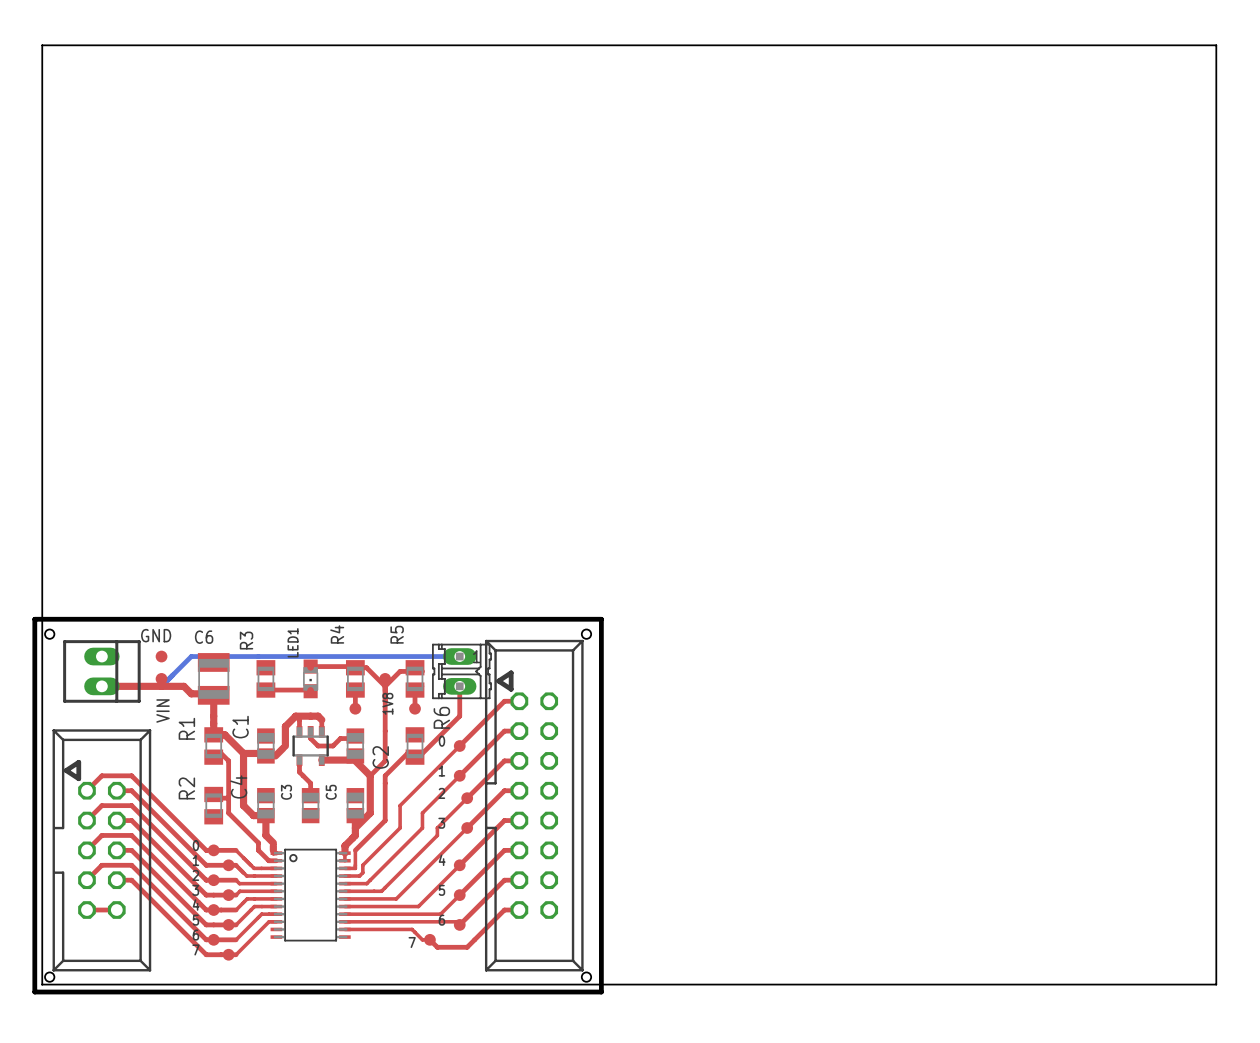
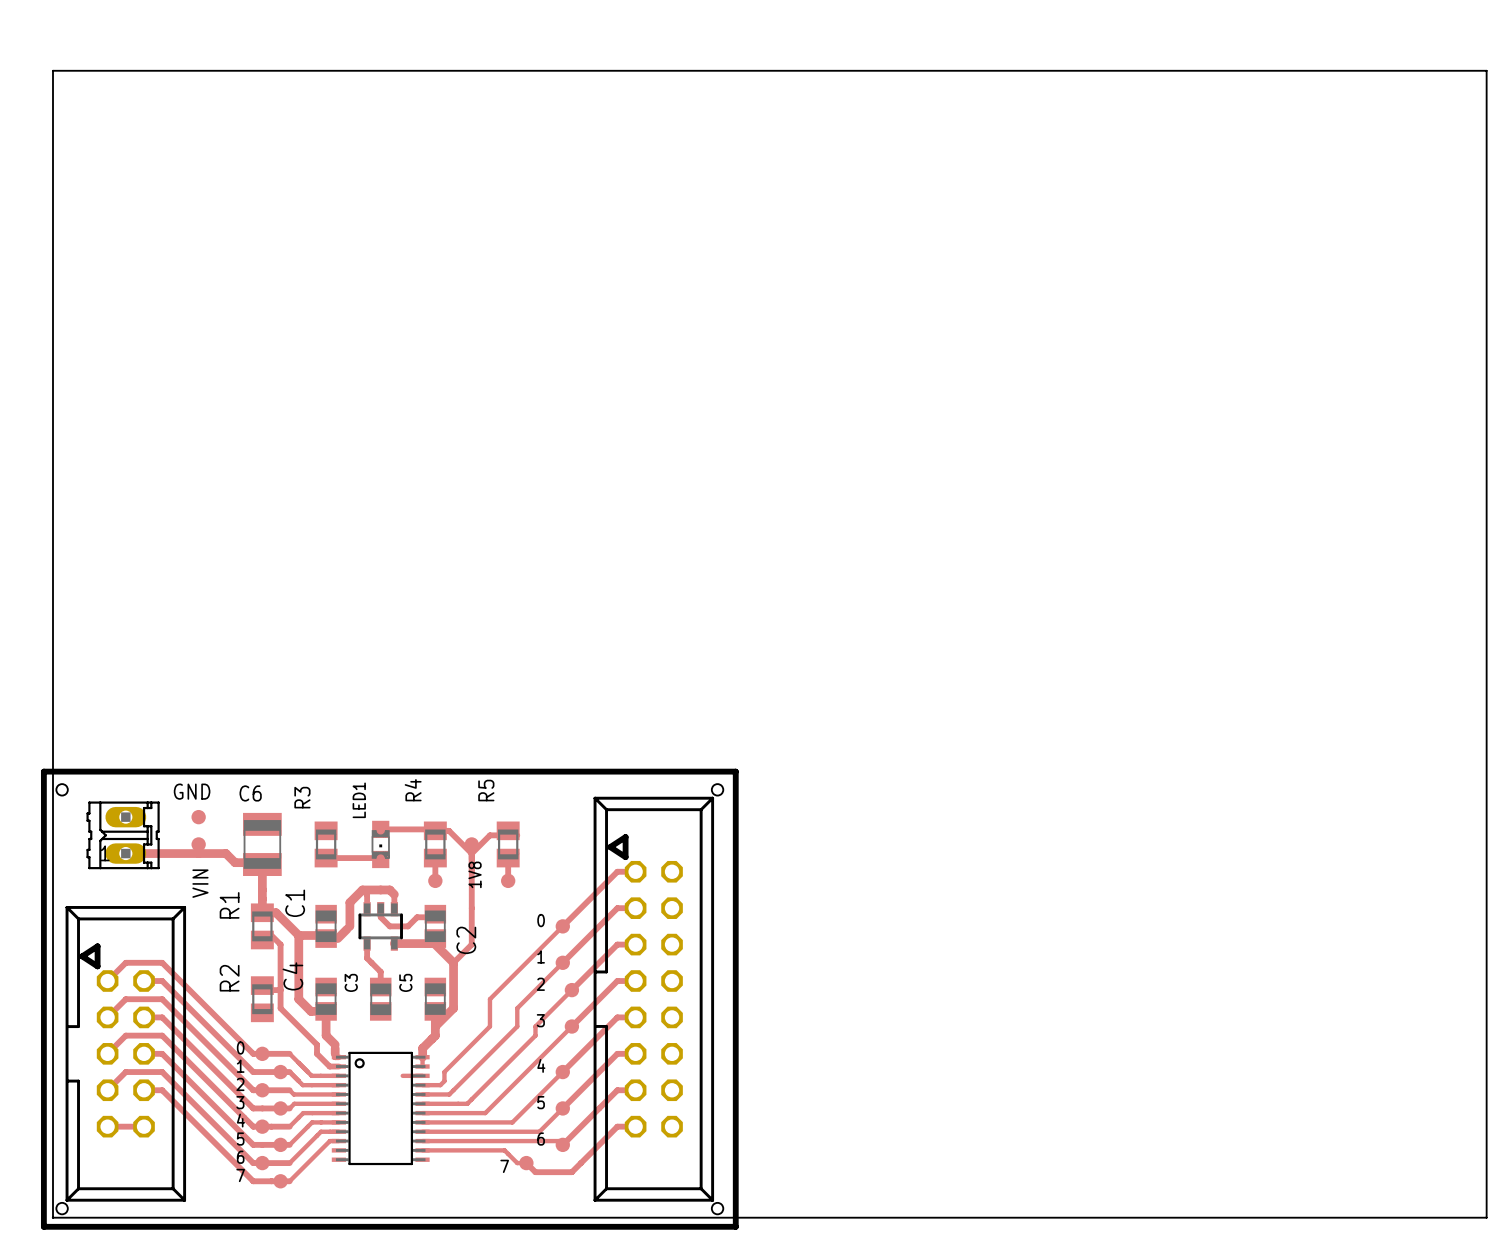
part footprint: [63, 640, 141, 703] -> [86, 801, 160, 870]
bottom track: (459, 656) (191, 656) (161, 686) (101, 686) -> none
part: (461, 671) -> none
top track: (459, 686) (459, 716) (415, 760) -> none
R6: (415, 745) -> none
top track: (415, 757) (411, 753) (407, 753) (385, 775) (385, 820) (355, 850) (355, 868) (344, 868) -> (402, 1075) (422, 1075)

